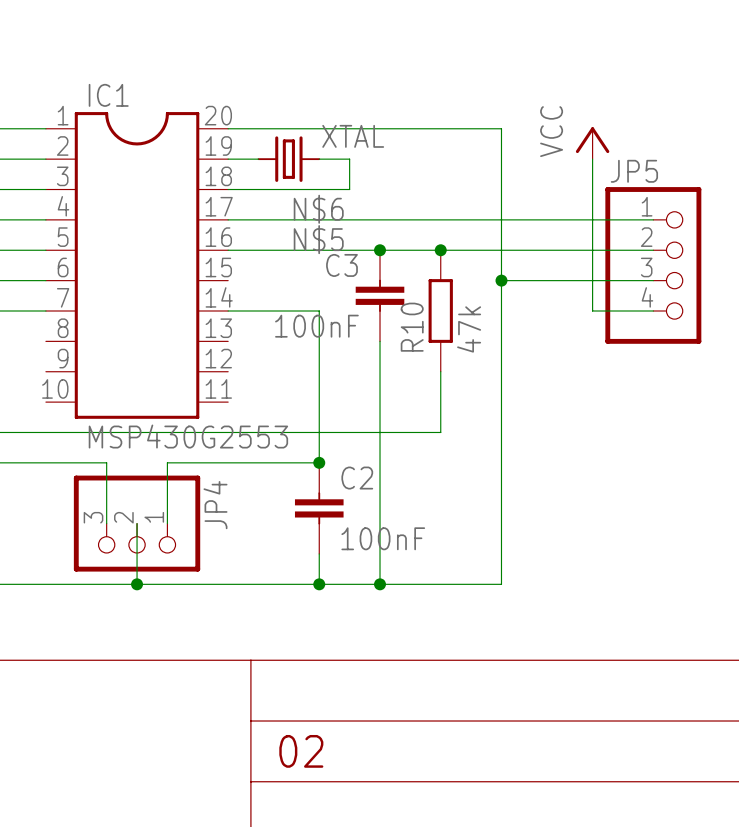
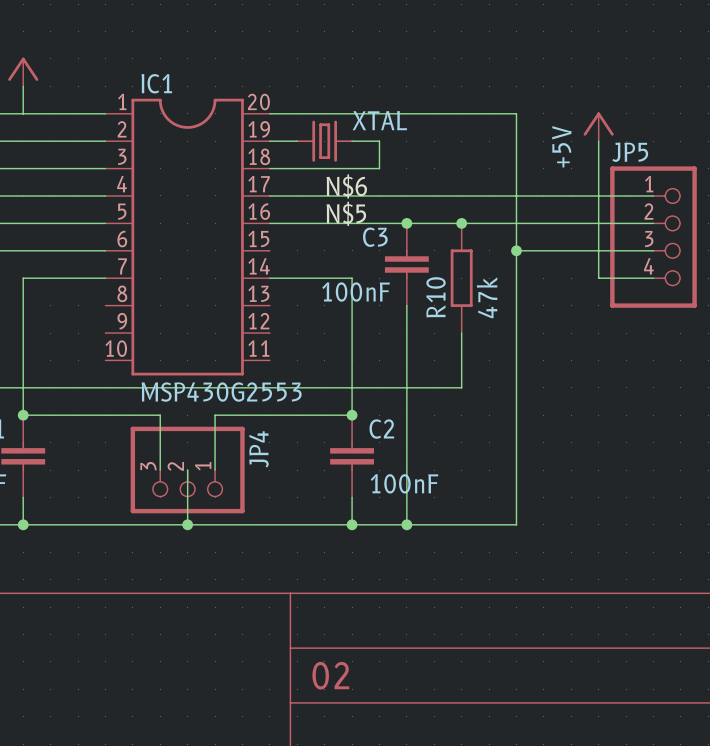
power symbol: VCC (592, 143) -> +5V (598, 126)

